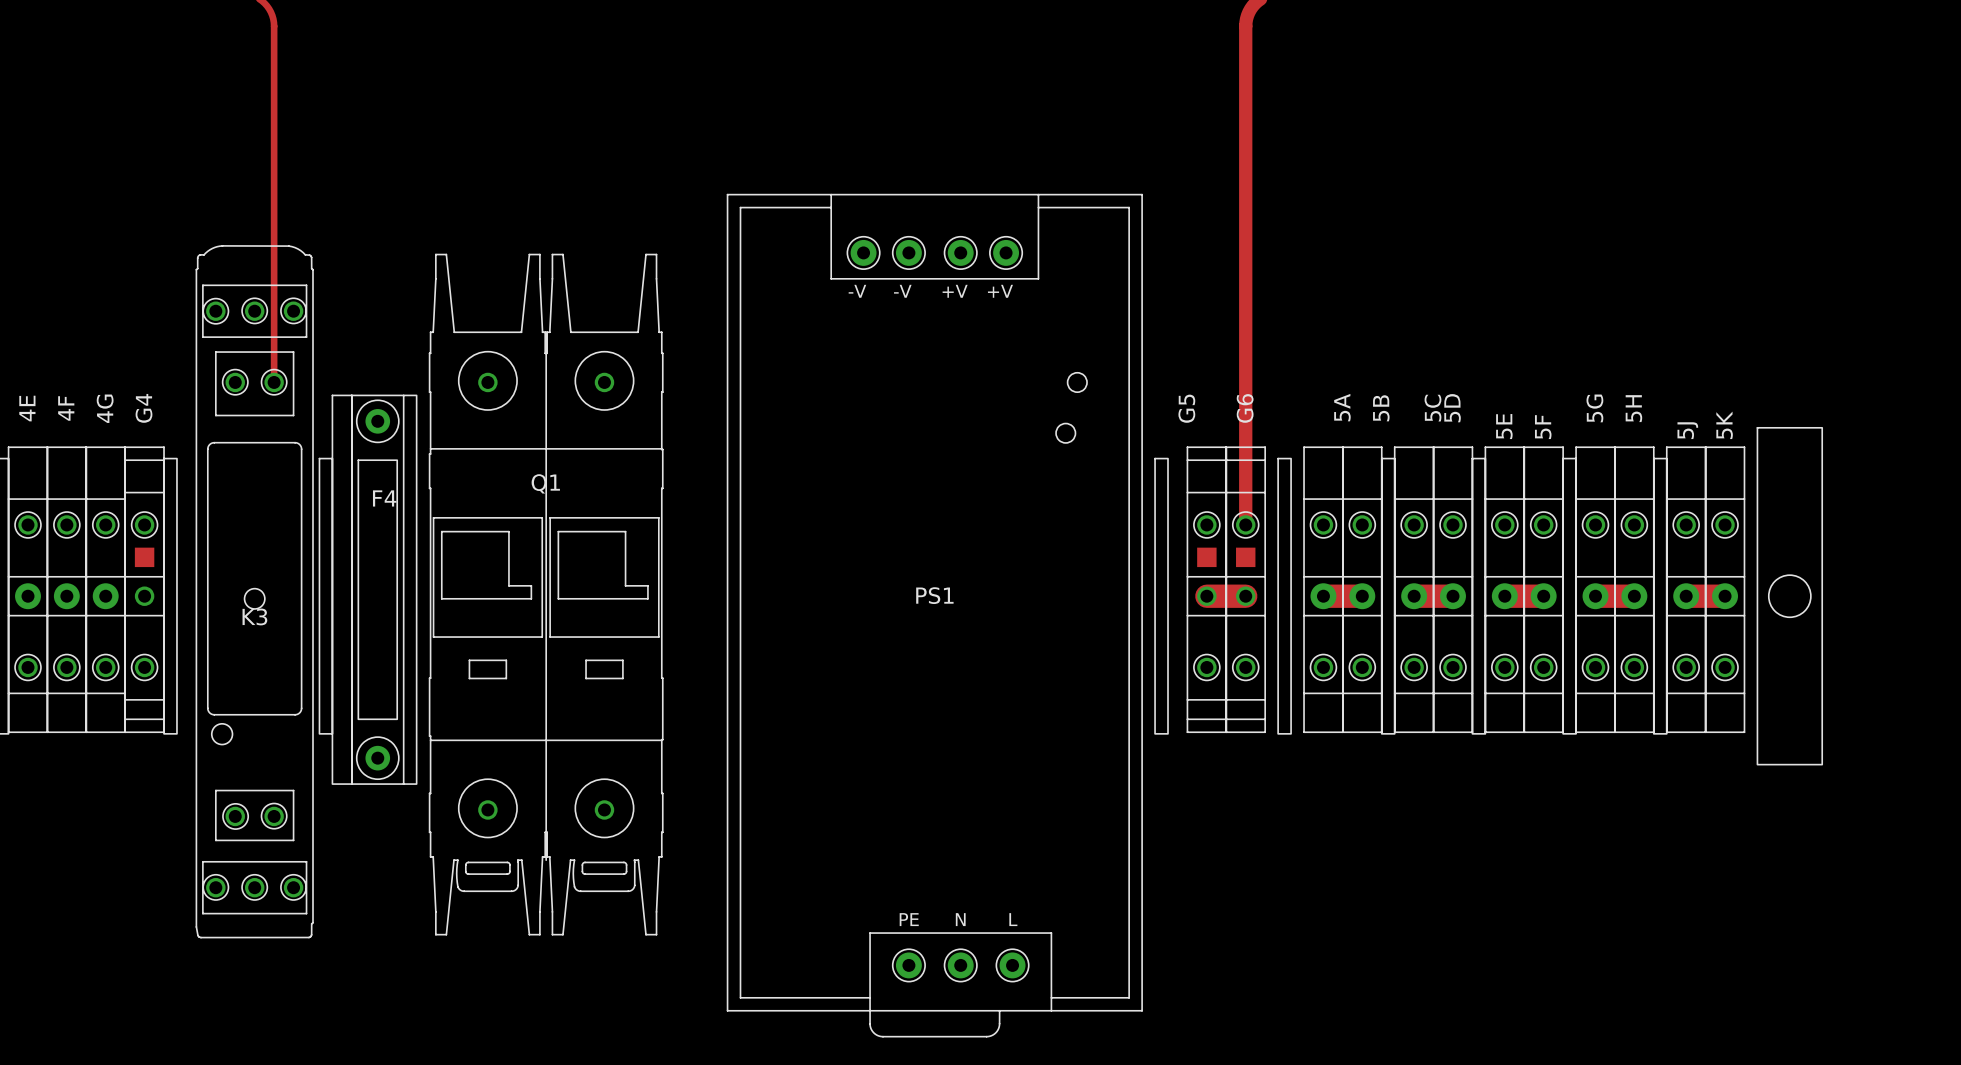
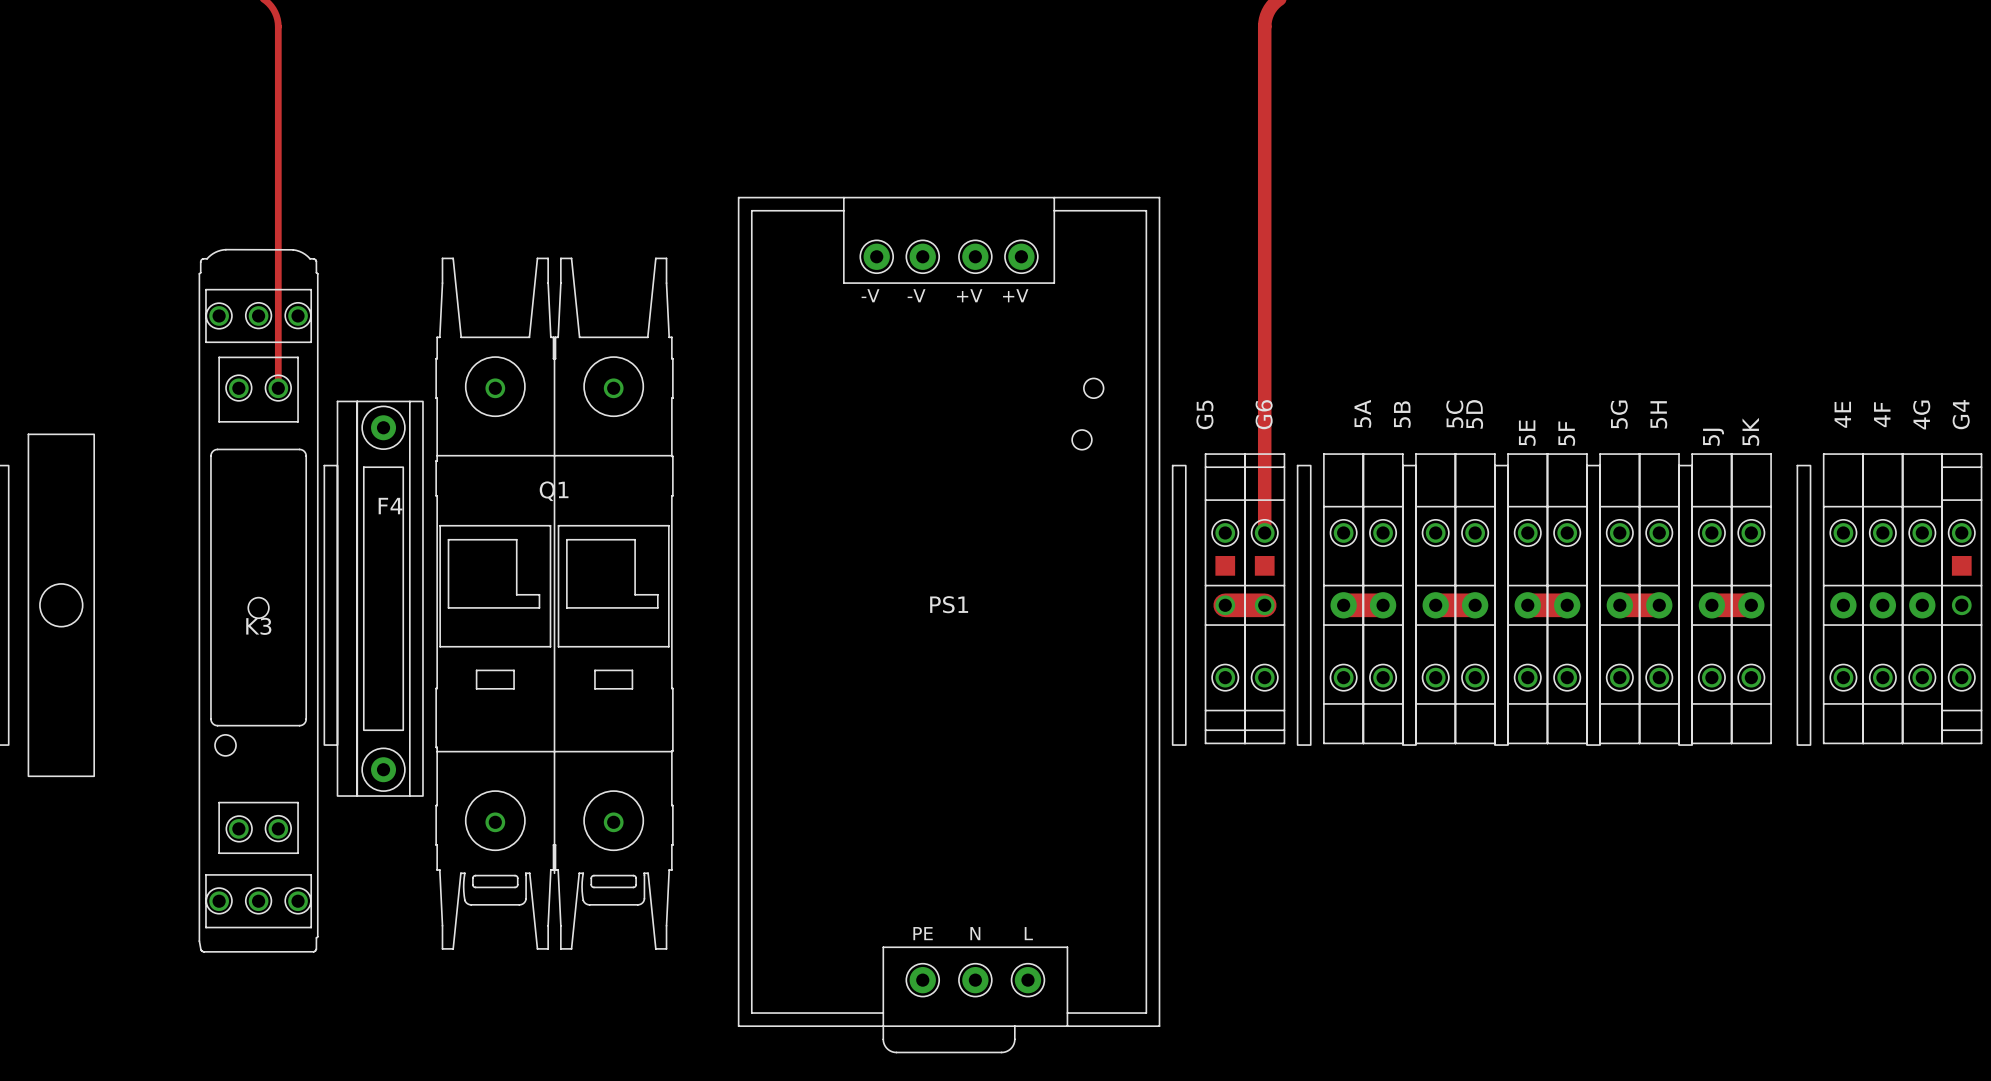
drawing: none -> [27, 433, 95, 777]
drawing: [1756, 427, 1823, 766] -> none
drawing: [163, 458, 178, 735] -> none
drawing: none -> [1796, 465, 1812, 746]
4E position: (27, 589) -> (1843, 598)
4F position: (66, 589) -> (1882, 598)
4G position: (105, 589) -> (1922, 598)
G4 position: (144, 589) -> (1961, 598)

